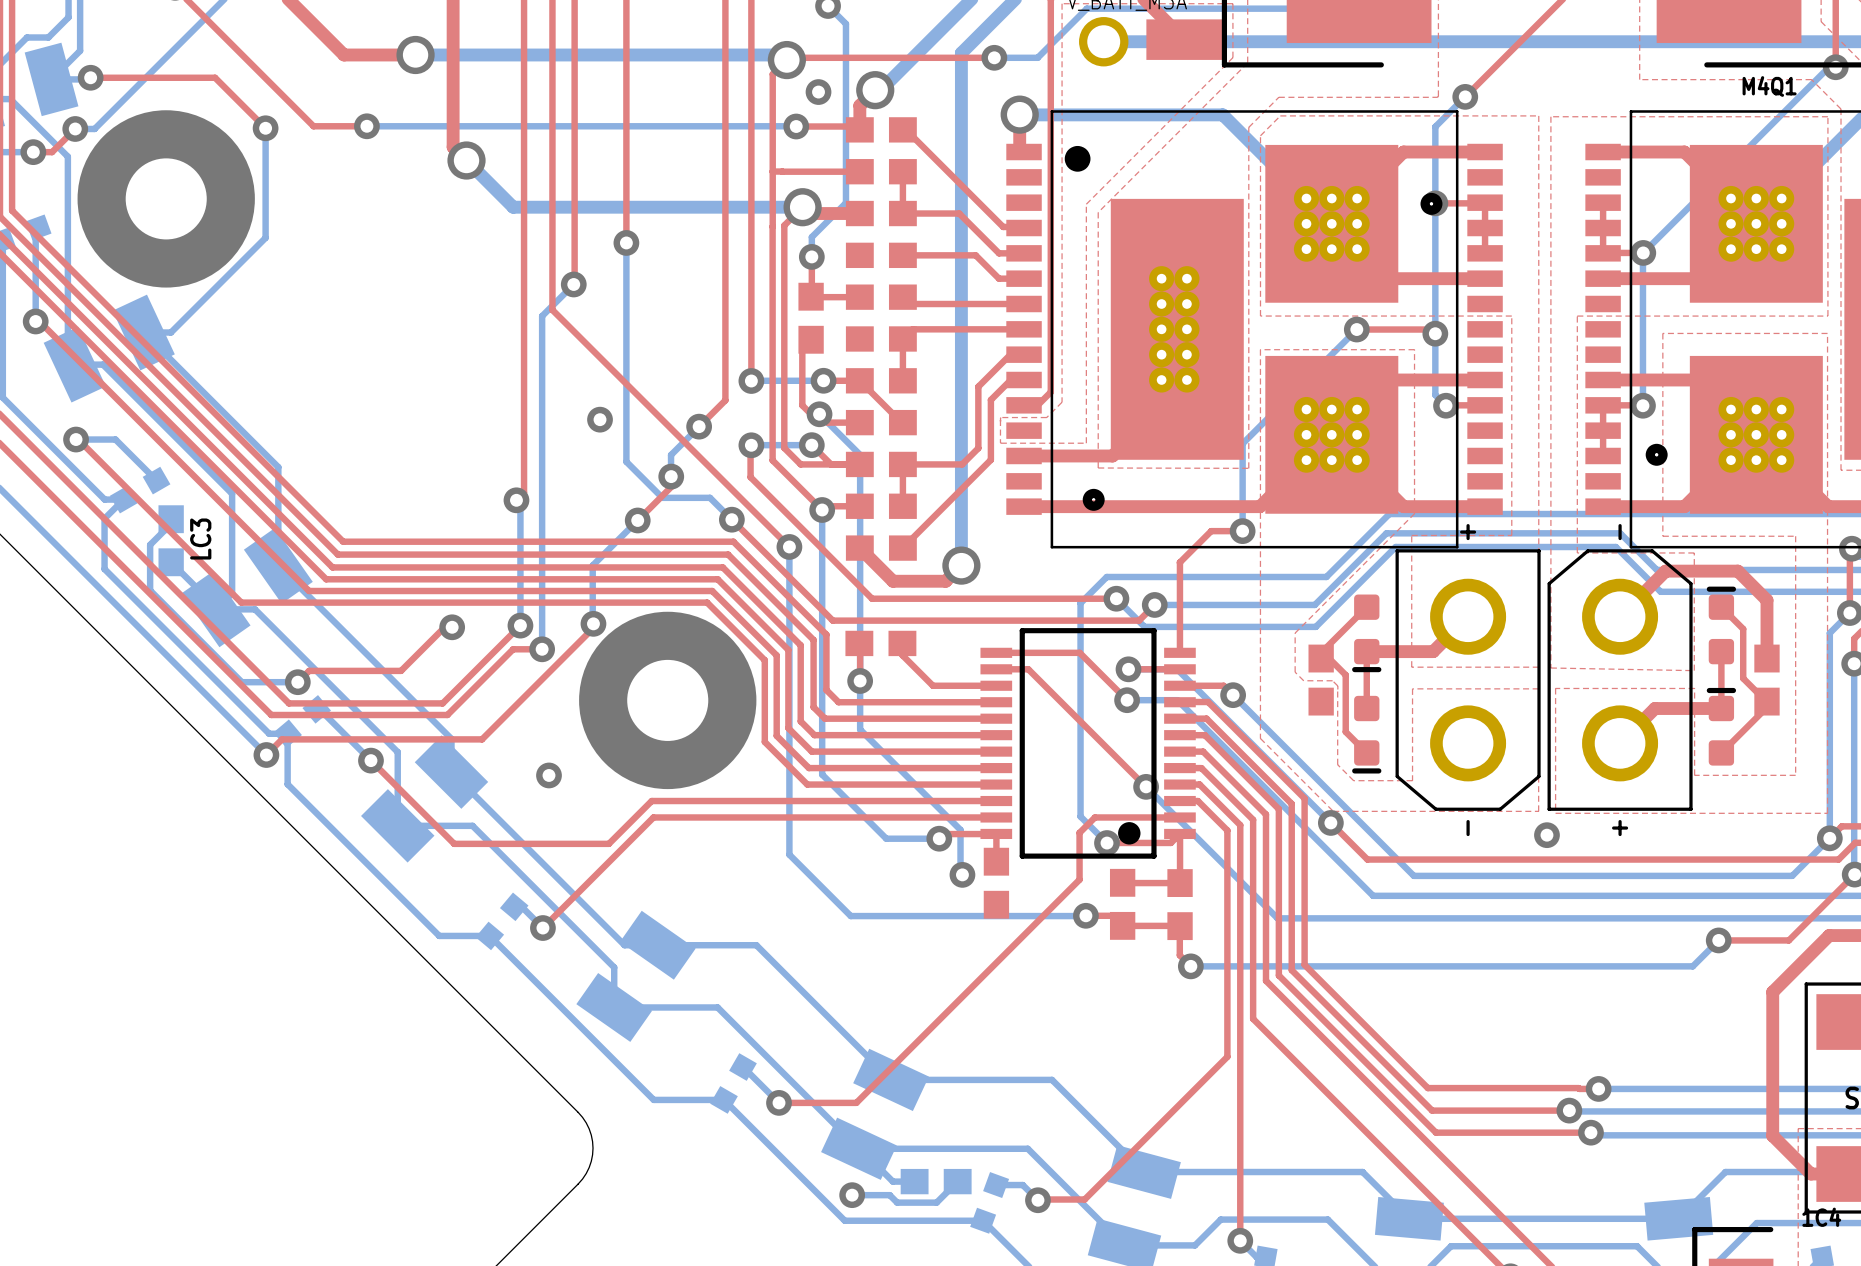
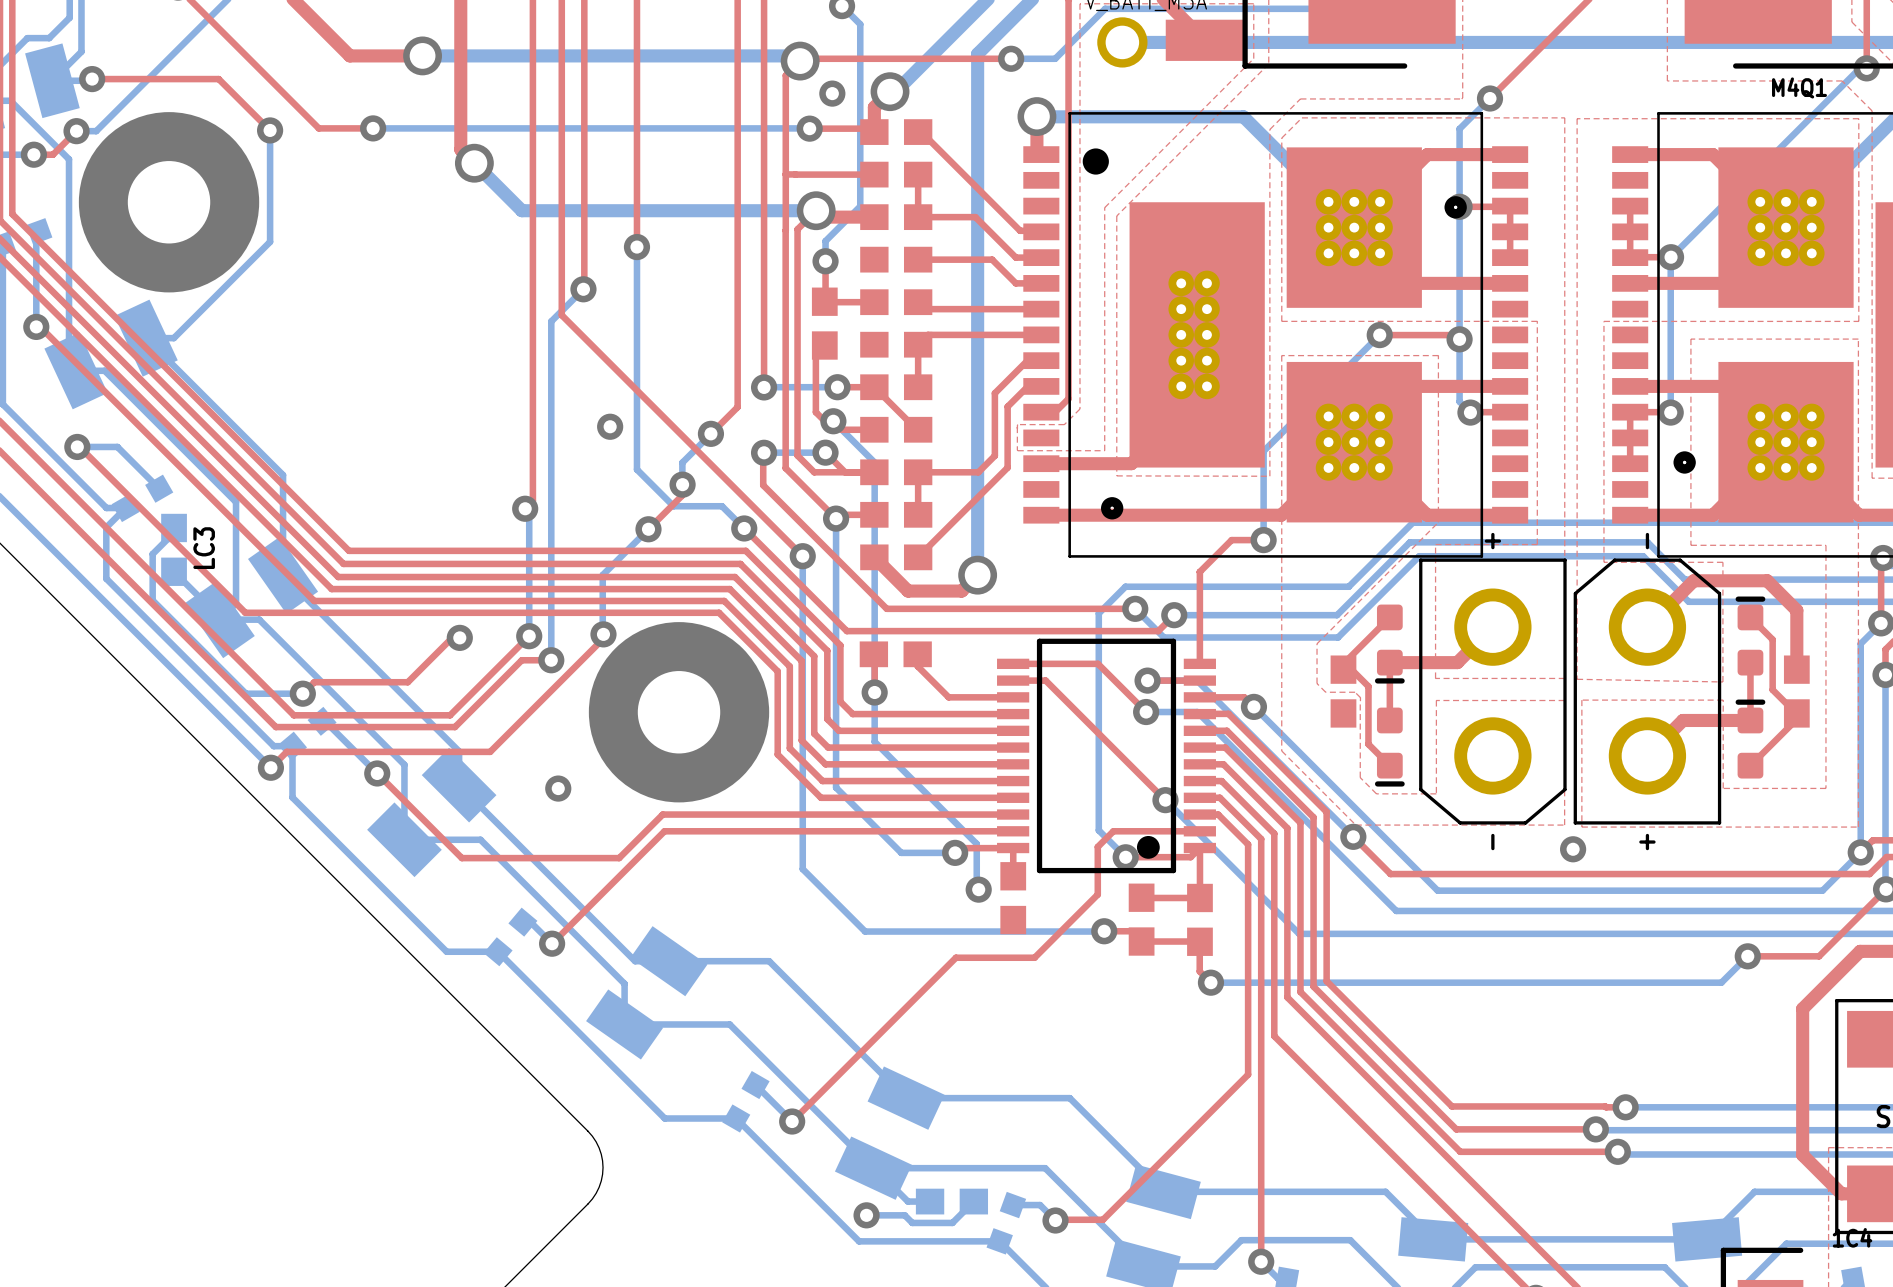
top track: (1017, 941) (856, 1102) (779, 1102) -> (1034, 957) (955, 957) (792, 1121)

